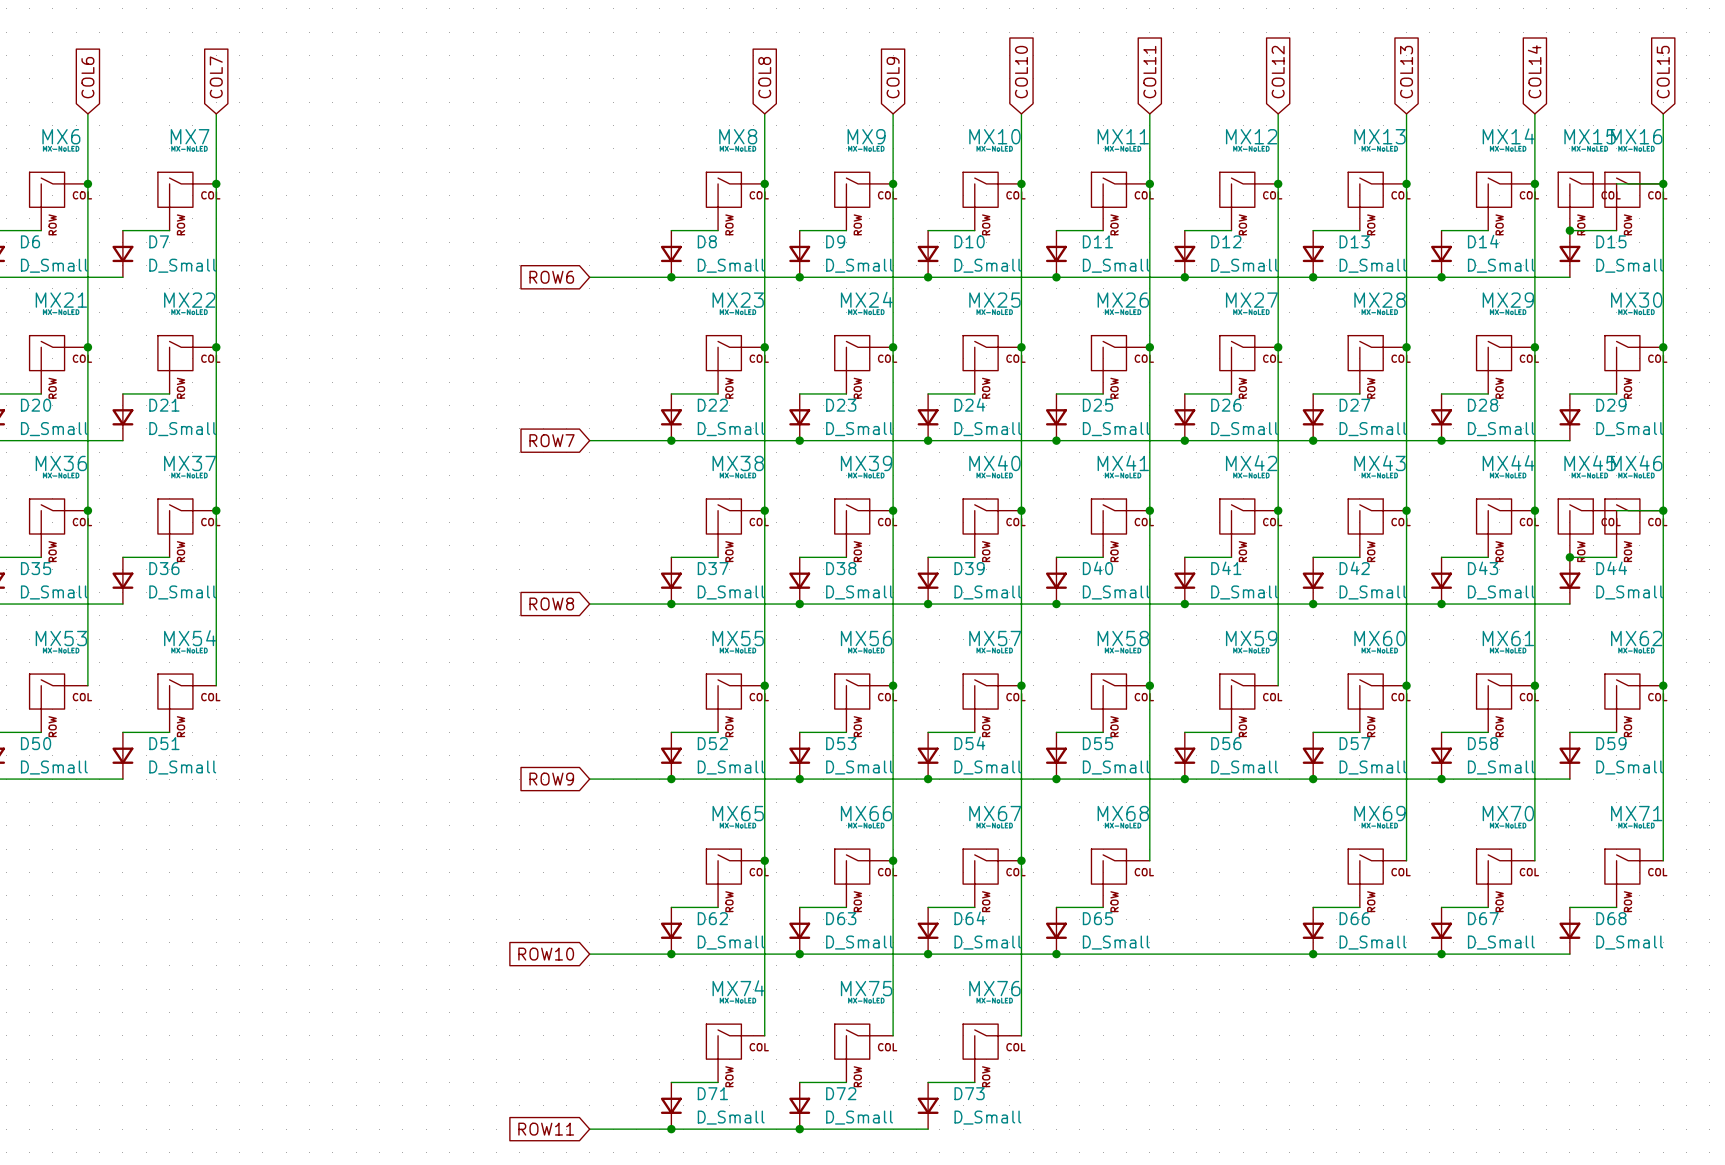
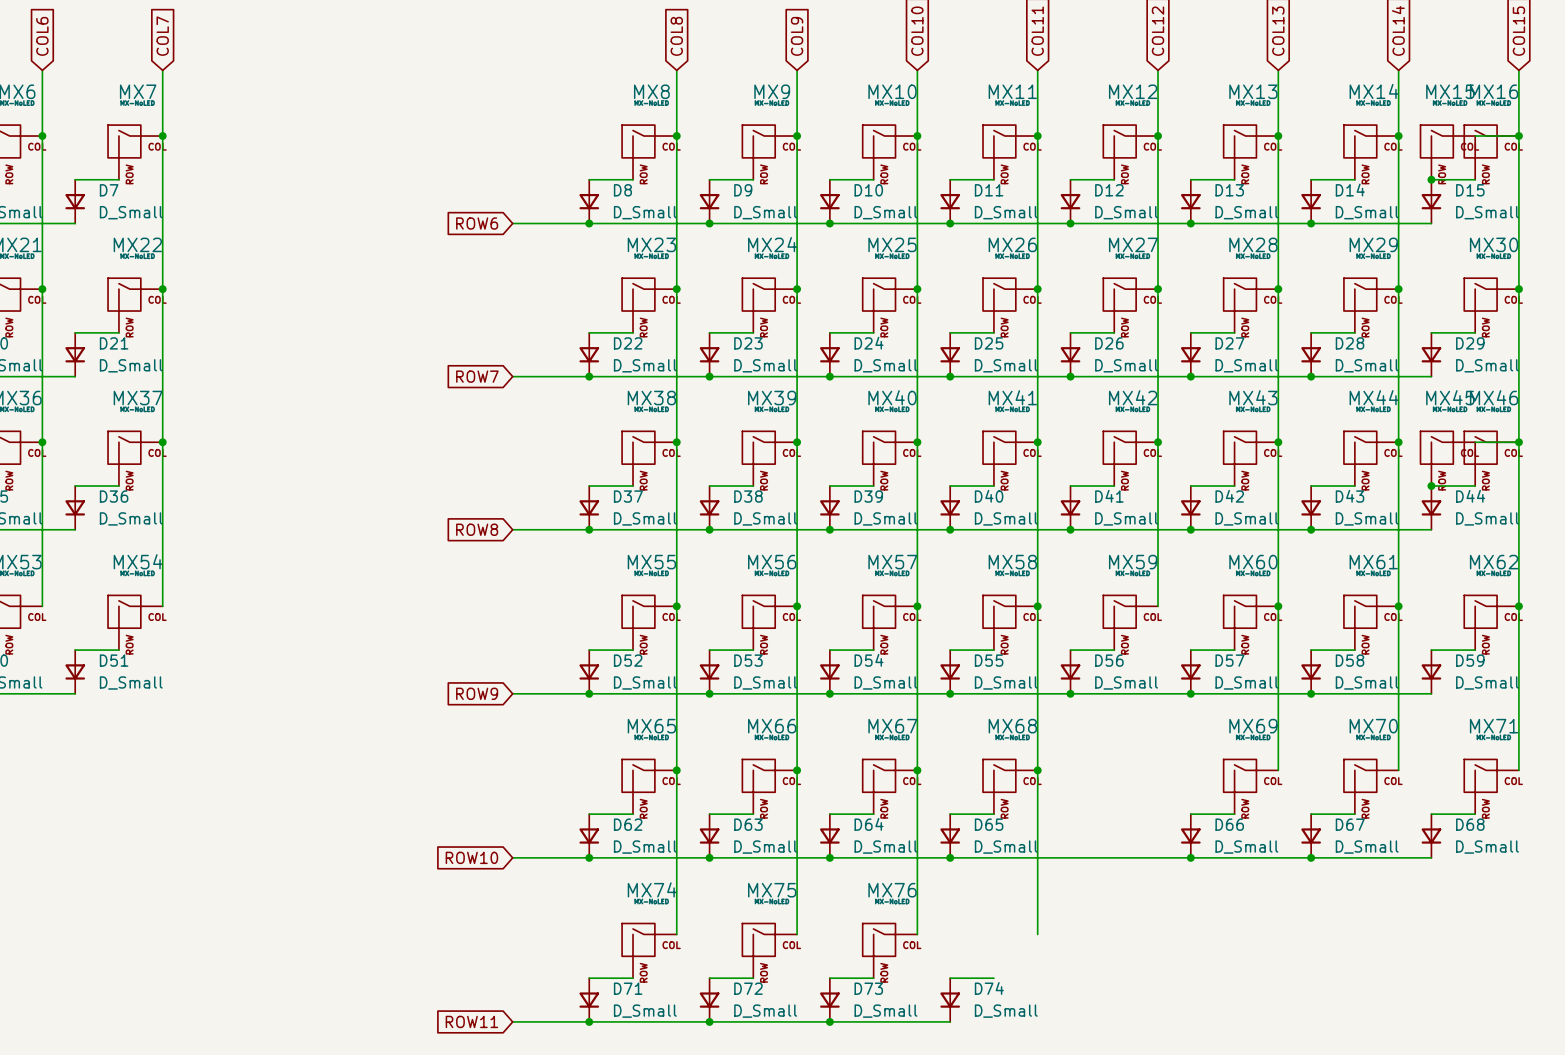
wire: none -> (1037, 770) (1037, 934)
junction: none -> (1037, 770)
wire: none -> (950, 978) (993, 978)
D74: none -> D_Small (950, 1000)
wire: none -> (829, 1021) (950, 1021)
junction: none -> (829, 1021)

